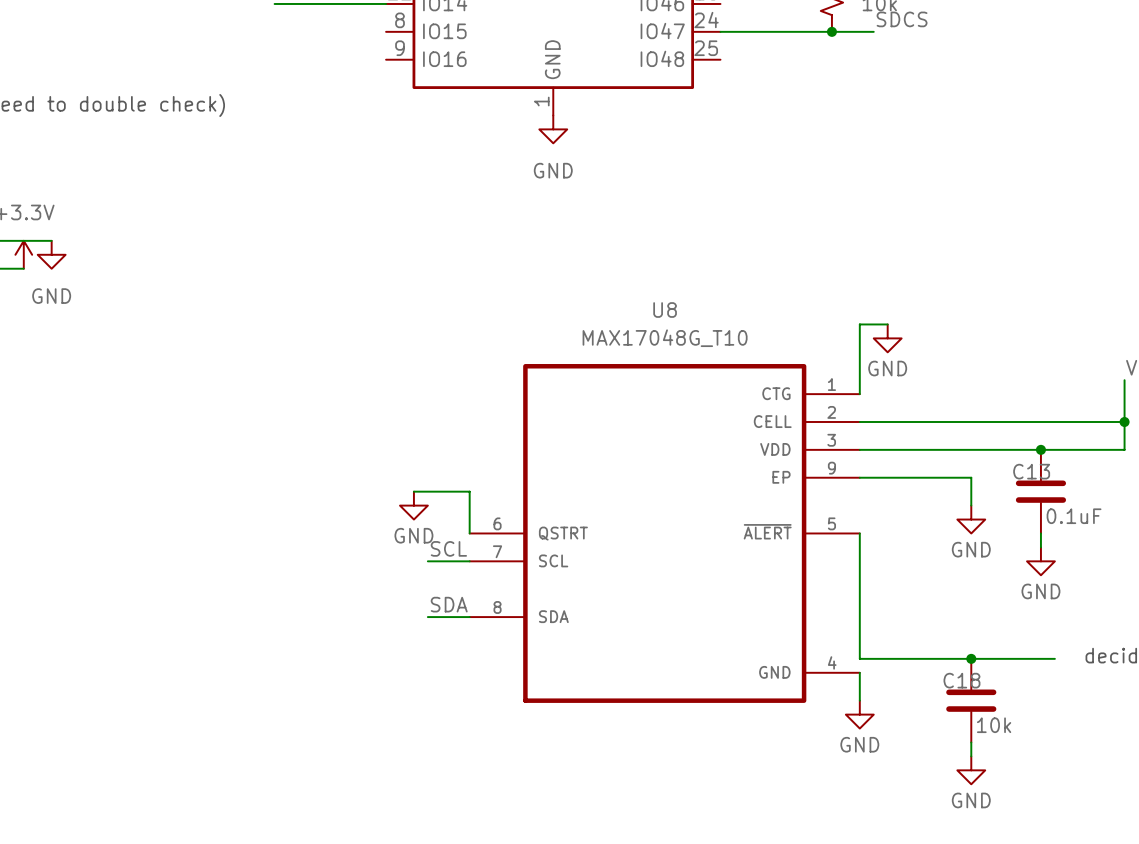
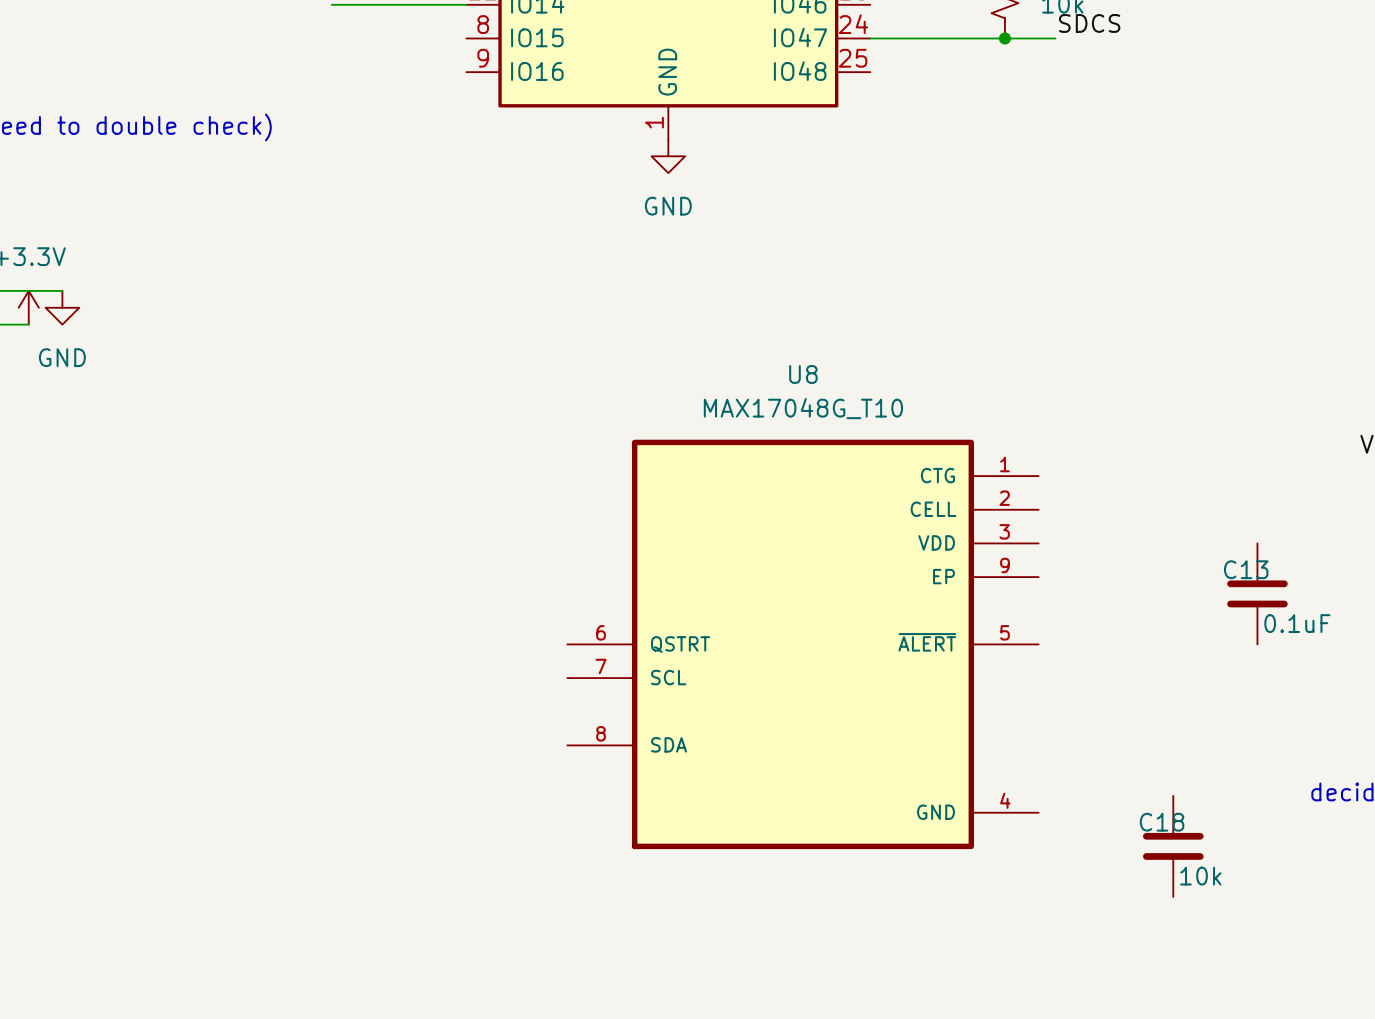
wire: (887, 324) (859, 324) (859, 394) -> none
power symbol: GND (887, 338) -> none
wire: (1124, 380) (1124, 449) (859, 449) -> none
wire: (859, 421) (1124, 421) -> none
junction: (1124, 421) -> none
junction: (1040, 449) -> none
wire: (859, 477) (971, 477) (971, 505) -> none
wire: (413, 491) (469, 491) (469, 533) -> none
power symbol: GND (413, 505) -> none
power symbol: GND (971, 519) -> none
wire: (859, 533) (859, 658) (1054, 658) -> none
wire: (1040, 533) (1040, 547) -> none
label: SCL (448, 548) -> none
wire: (427, 561) (469, 561) -> none
power symbol: GND (1040, 561) -> none
label: SDA (449, 604) -> none
wire: (427, 617) (469, 617) -> none
junction: (971, 658) -> none
wire: (859, 672) (859, 700) -> none
power symbol: GND (859, 714) -> none
wire: (971, 742) (971, 756) -> none
power symbol: GND (971, 770) -> none

